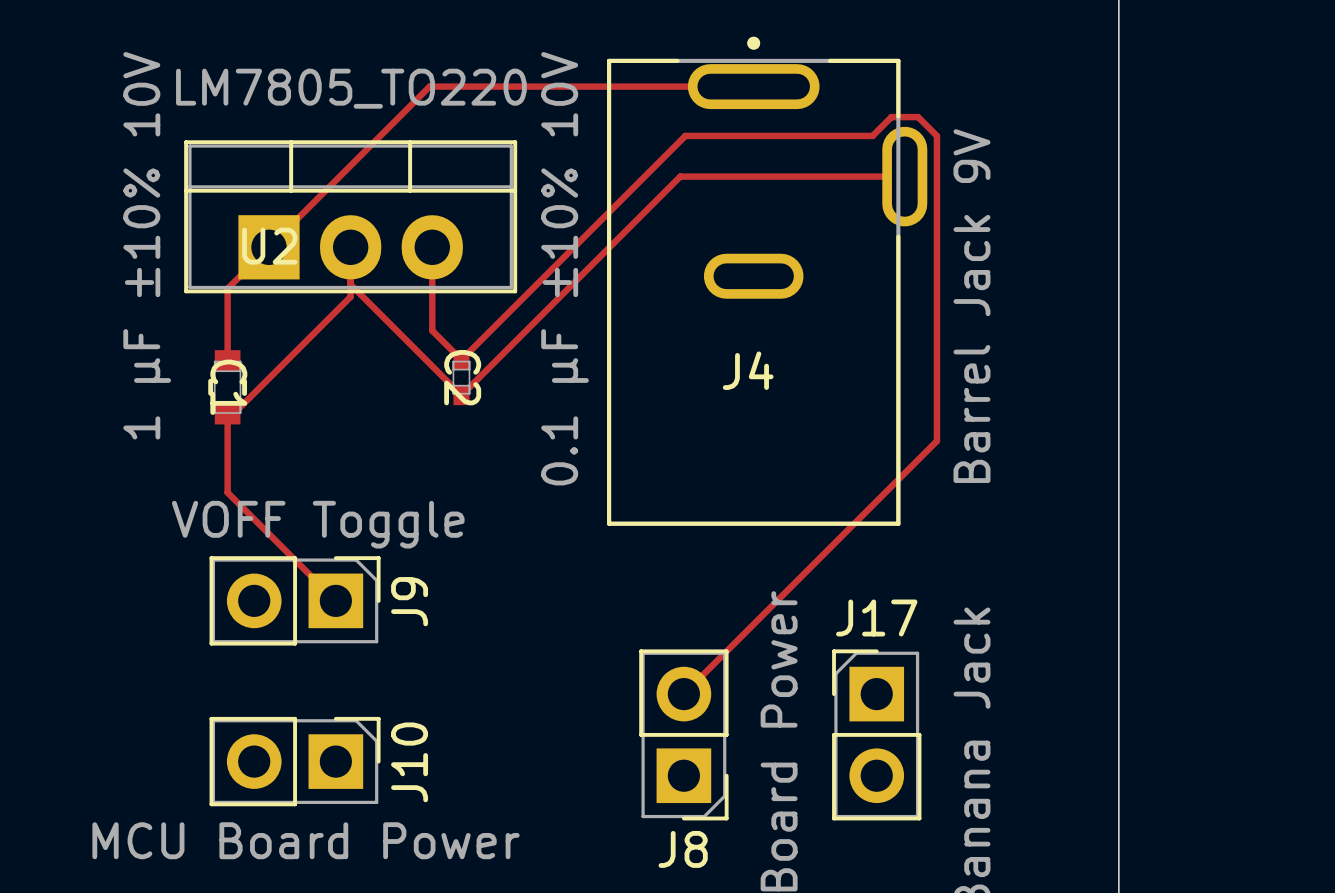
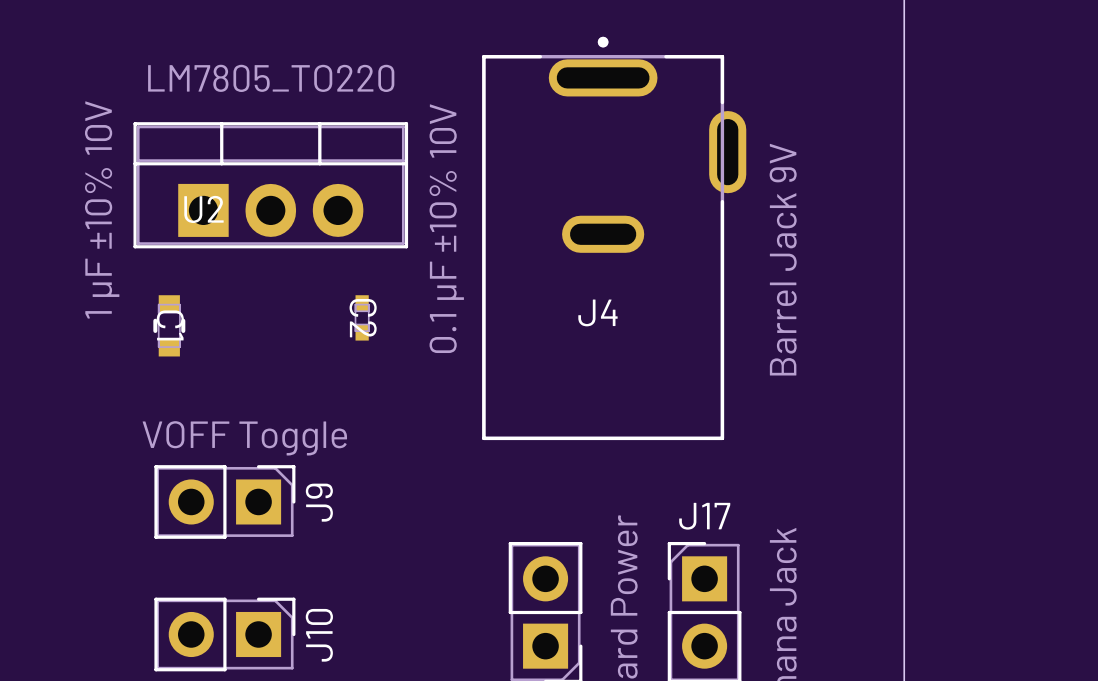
track: (753, 86) (429, 86) (227, 288) (227, 360) -> none
track: (904, 176) (680, 176) (461, 395) (350, 284) -> none
track: (350, 247) (350, 296) (233, 413) (227, 413) (227, 492) (335, 600) -> none
track: (432, 247) (432, 330) (461, 359) (685, 135) (872, 135) (891, 117) (918, 117) (936, 135) (936, 441) (683, 694) -> none

